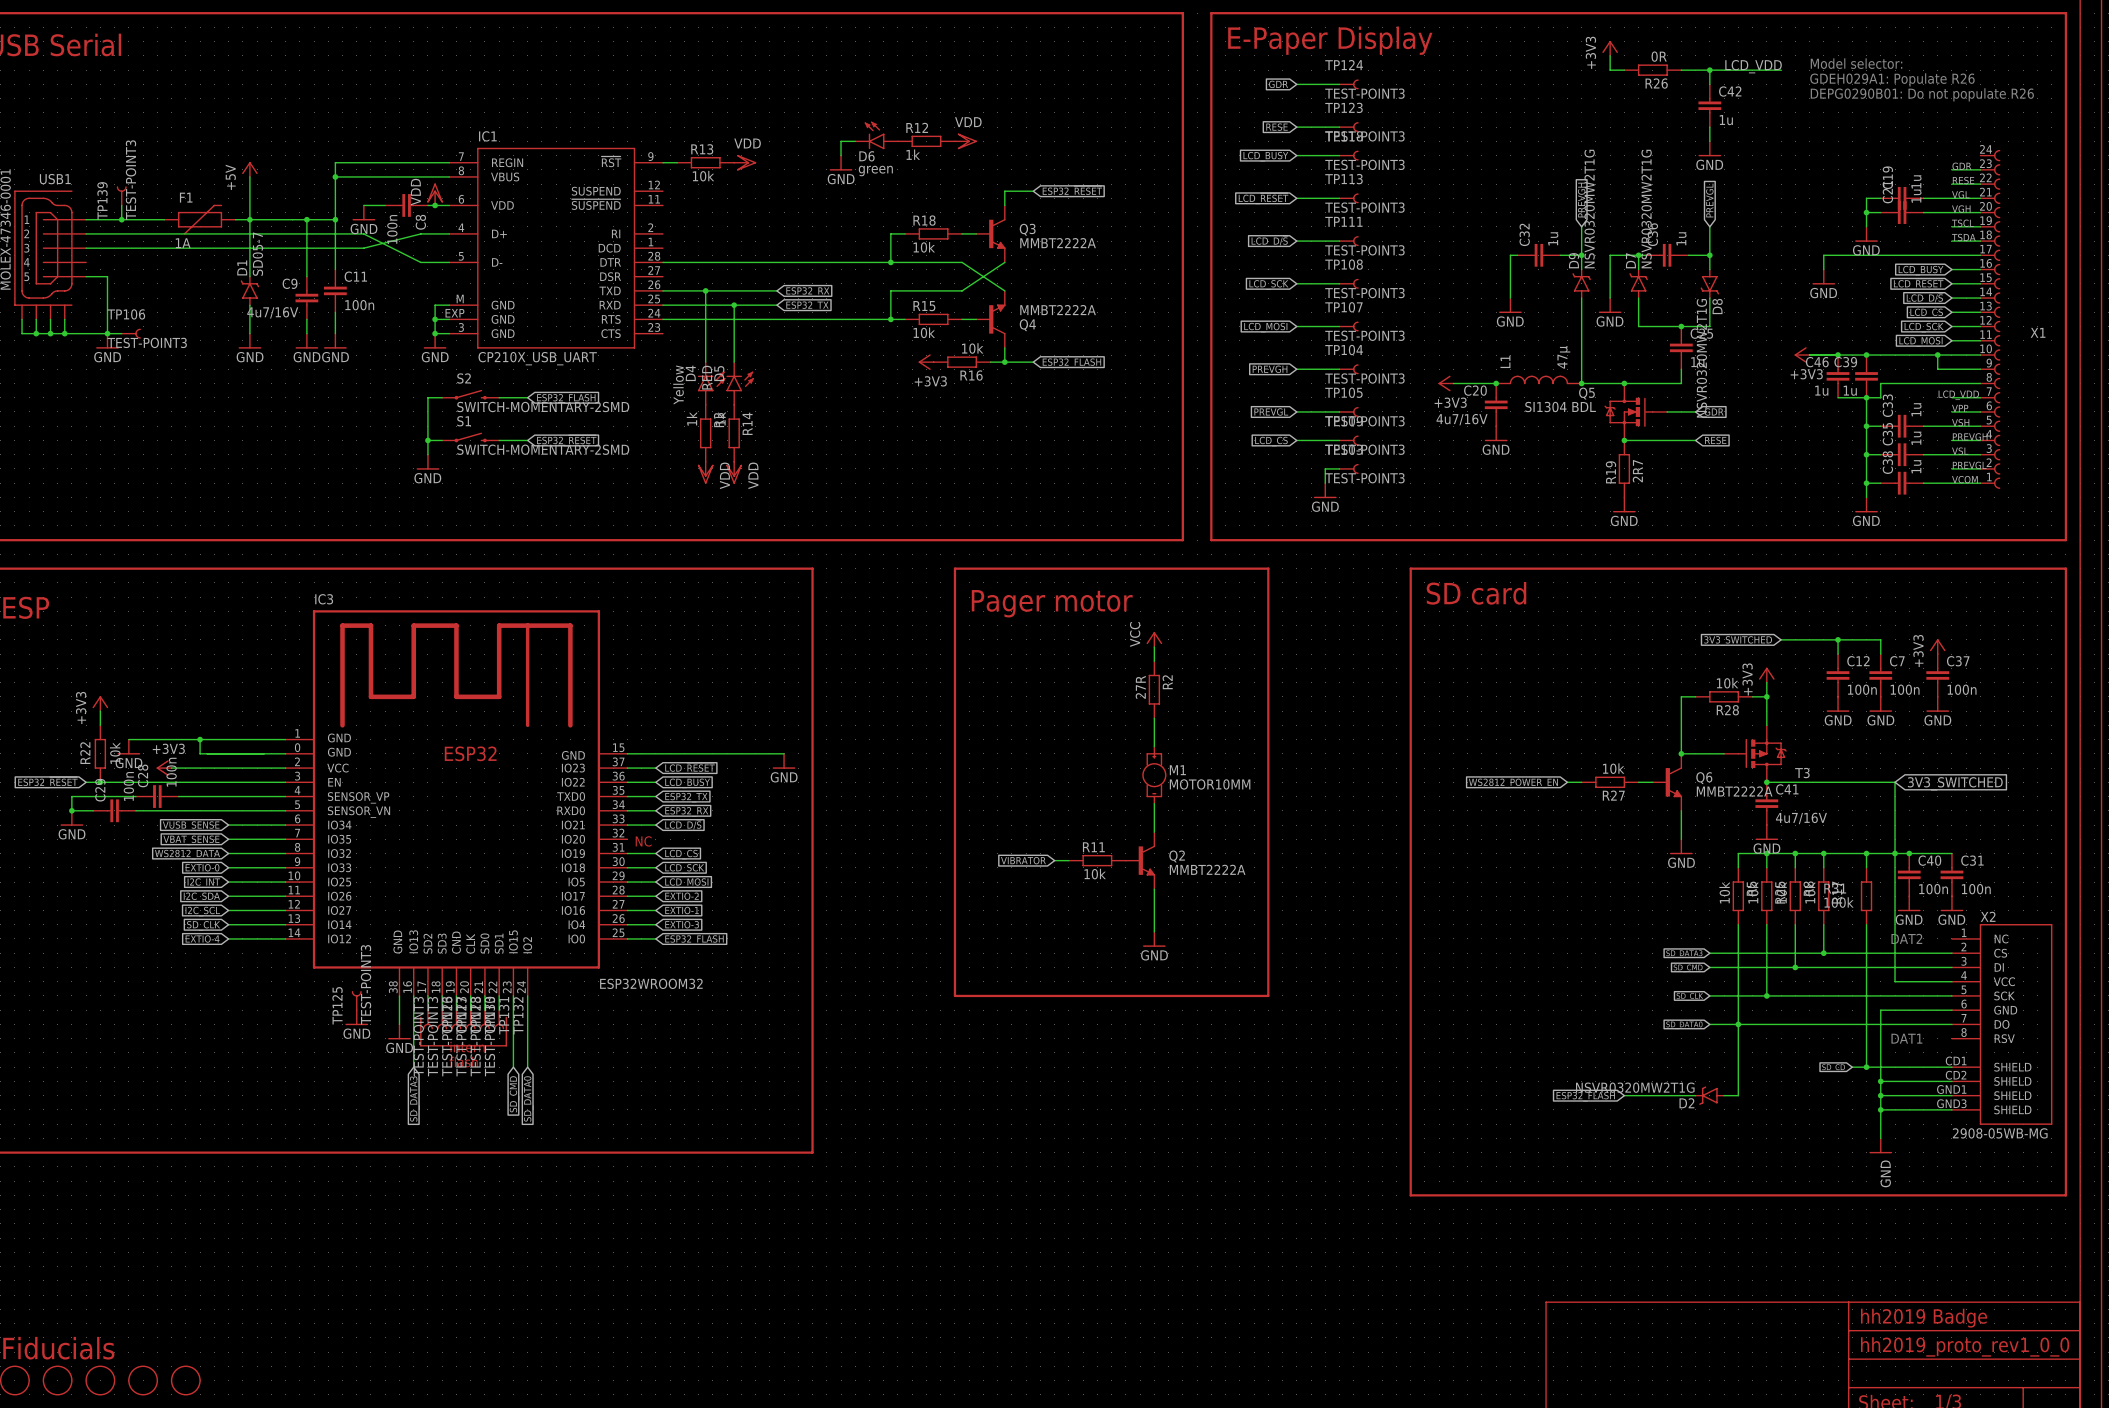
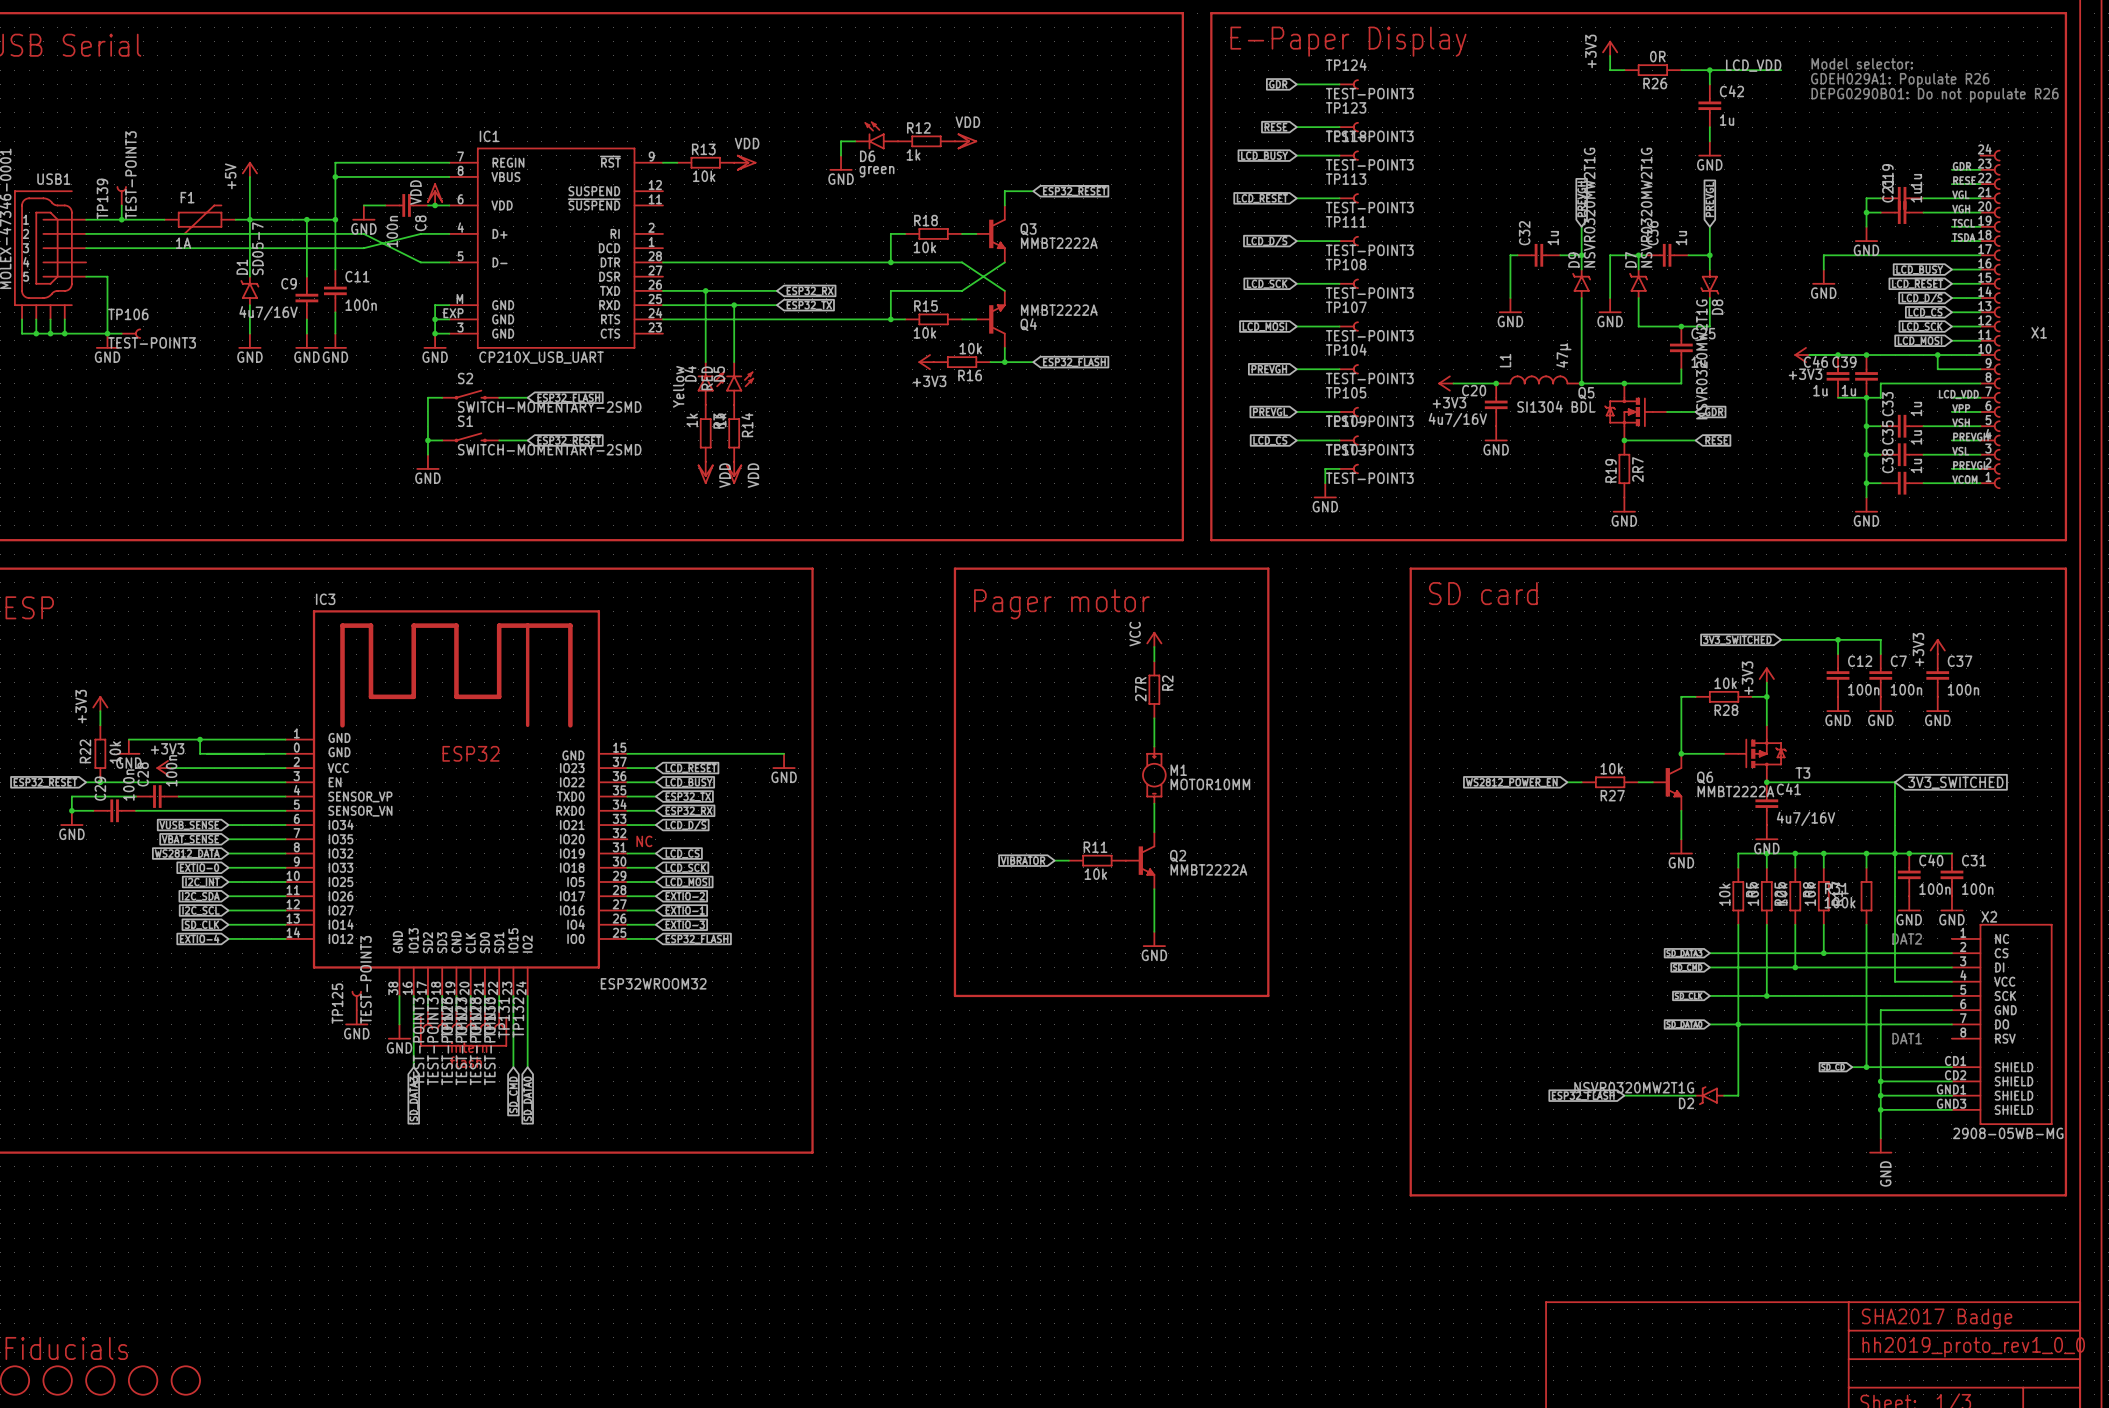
text: hh2019 Badge (1924, 1318) -> SHA2017 Badge (1937, 1318)

